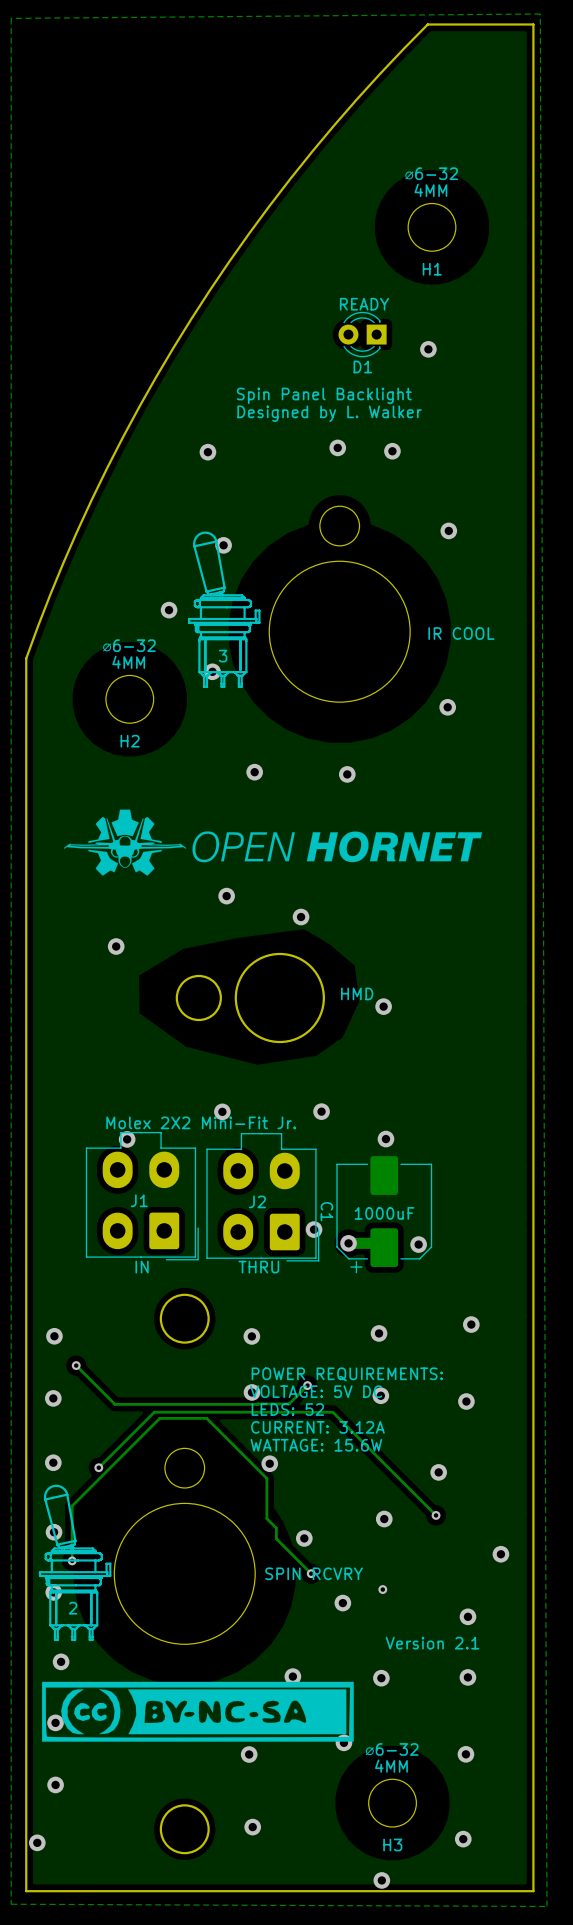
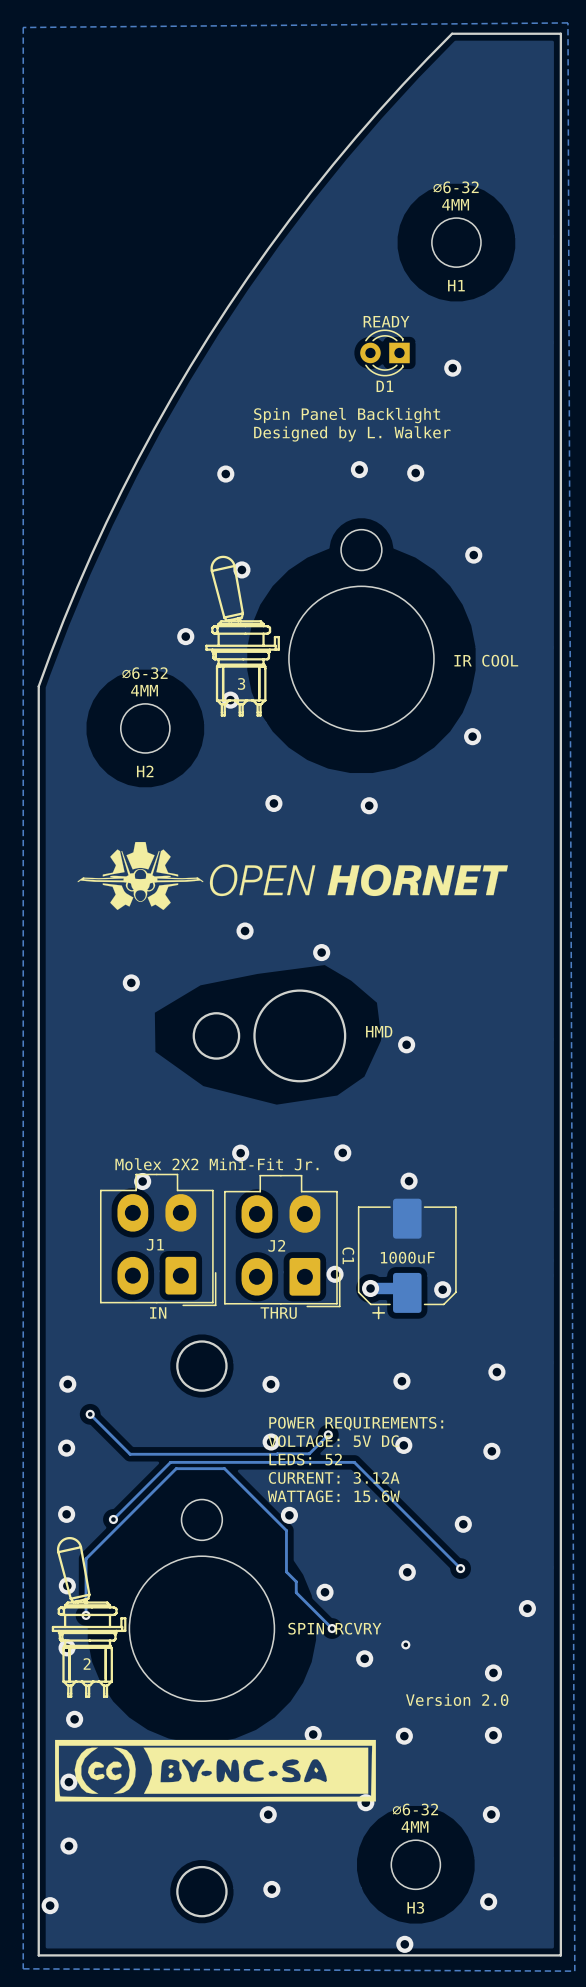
text: Version 2.1 (432, 1643) -> Version 2.0 (457, 1699)

